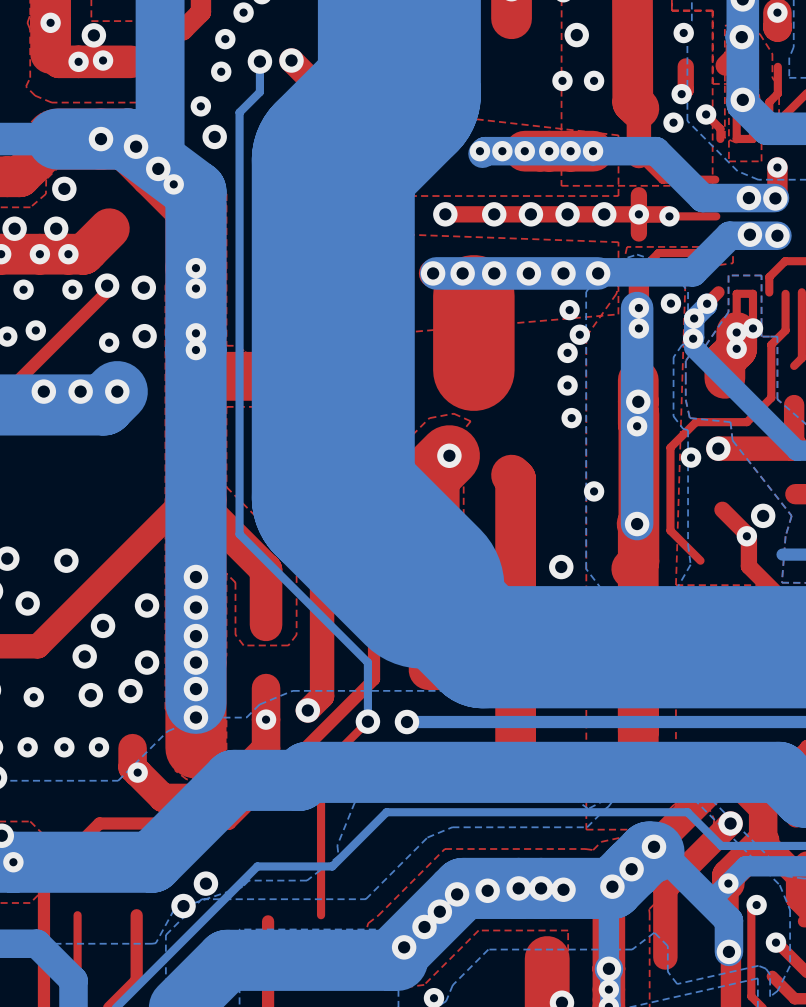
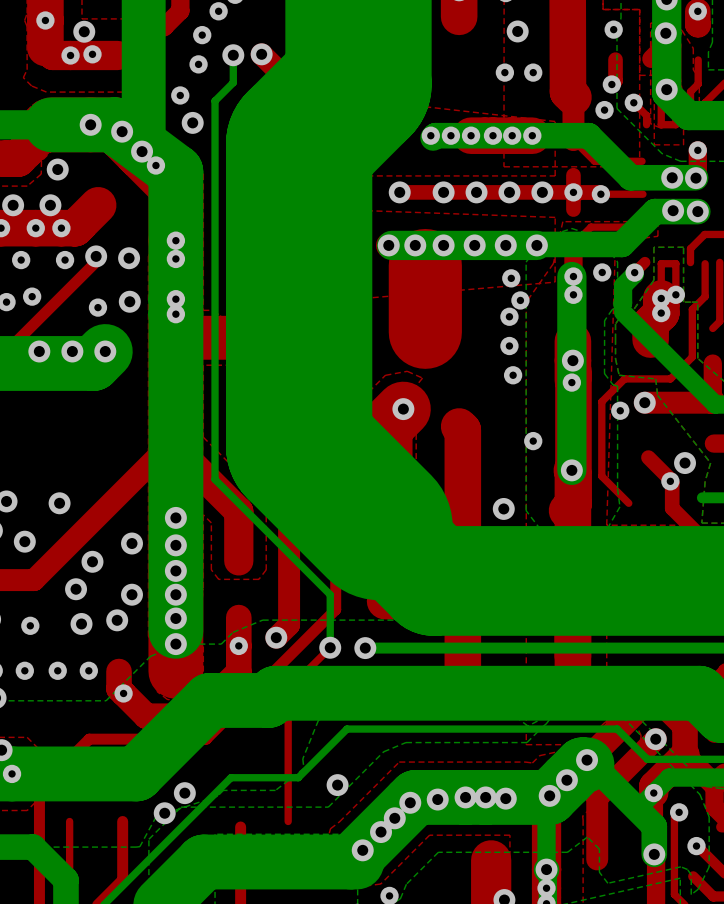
via: (694, 318) -> none
via: (693, 338) -> none
via: none -> (337, 785)

